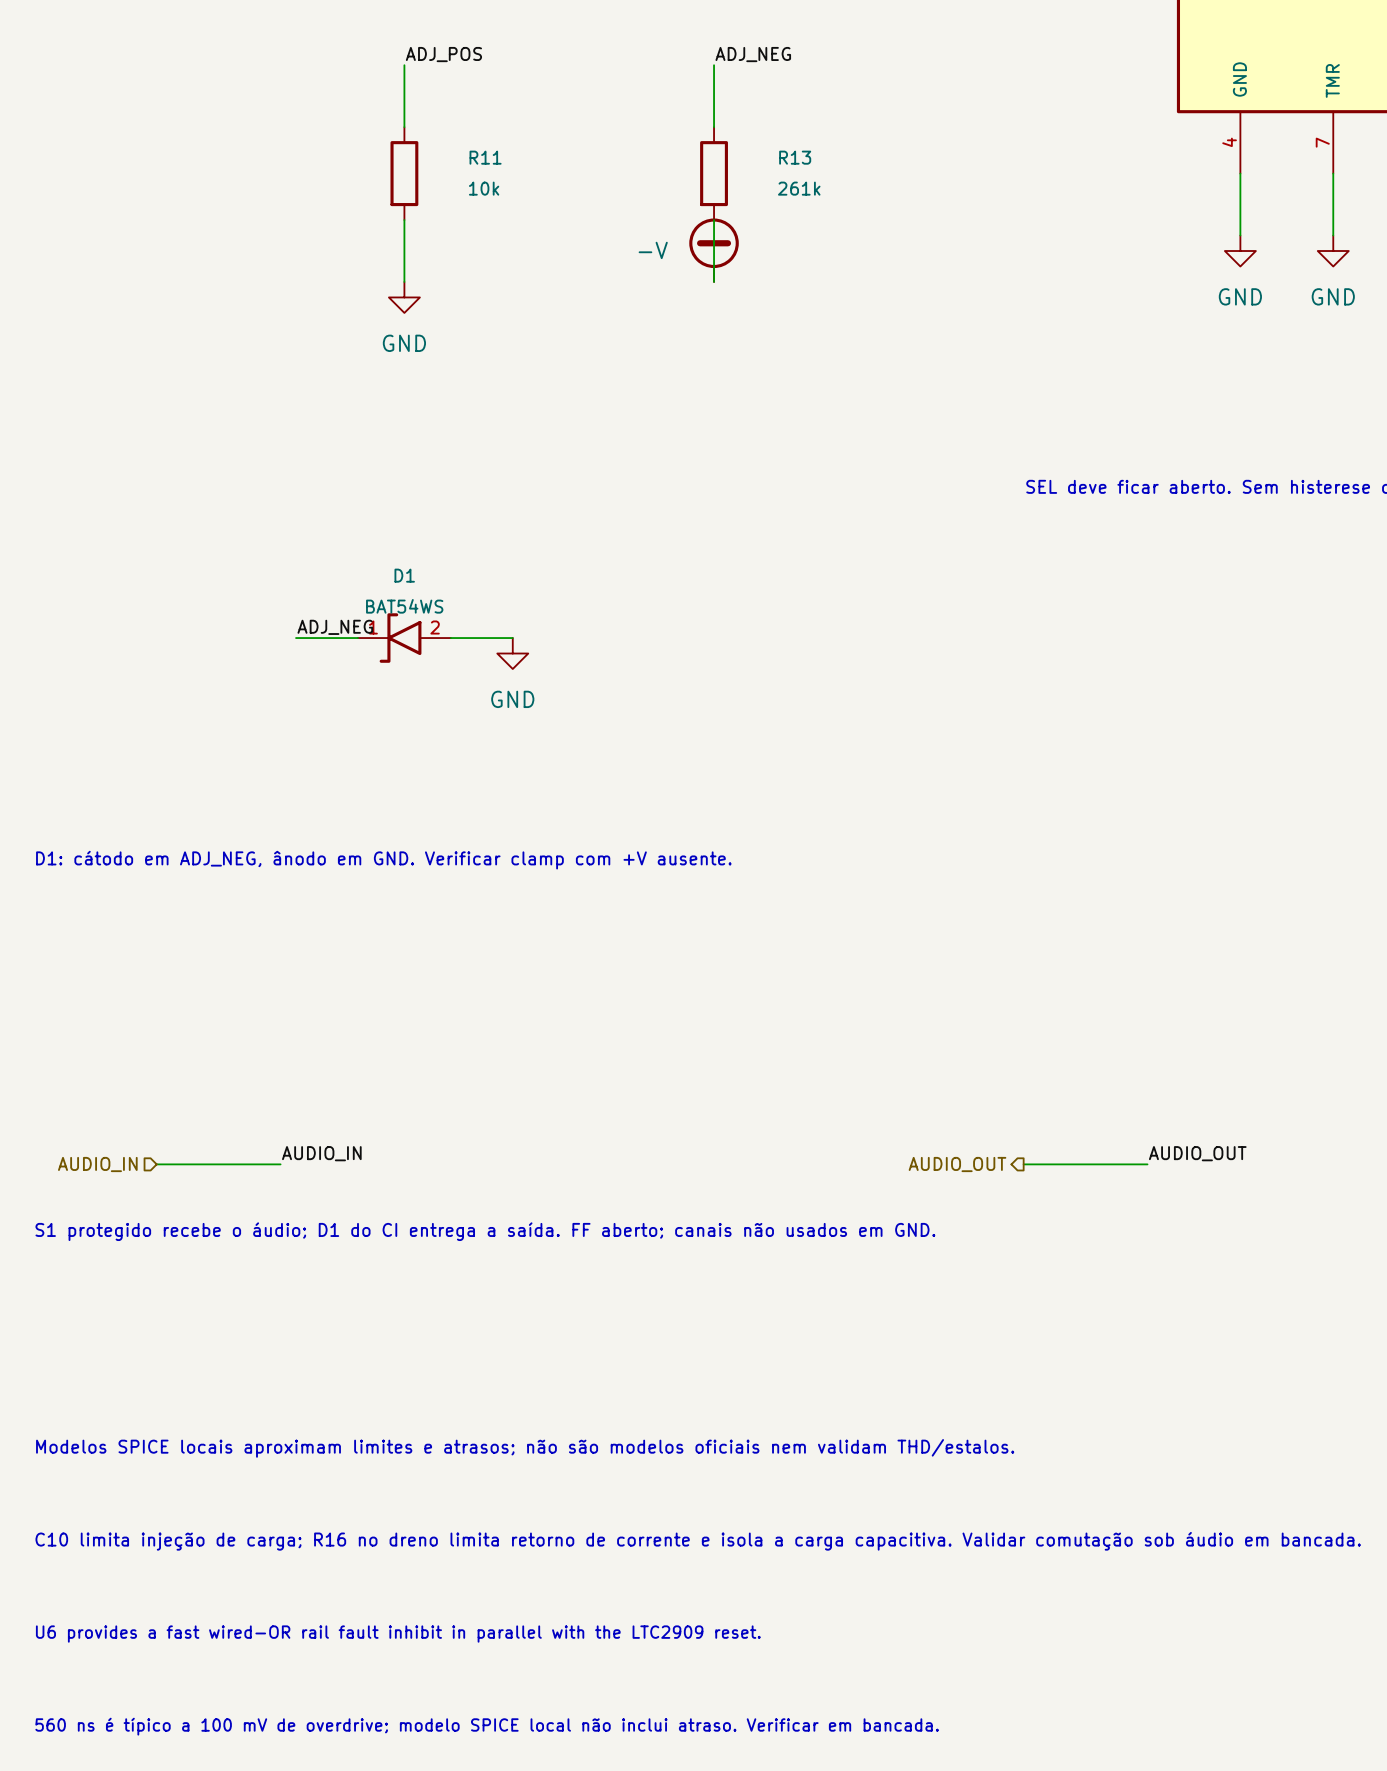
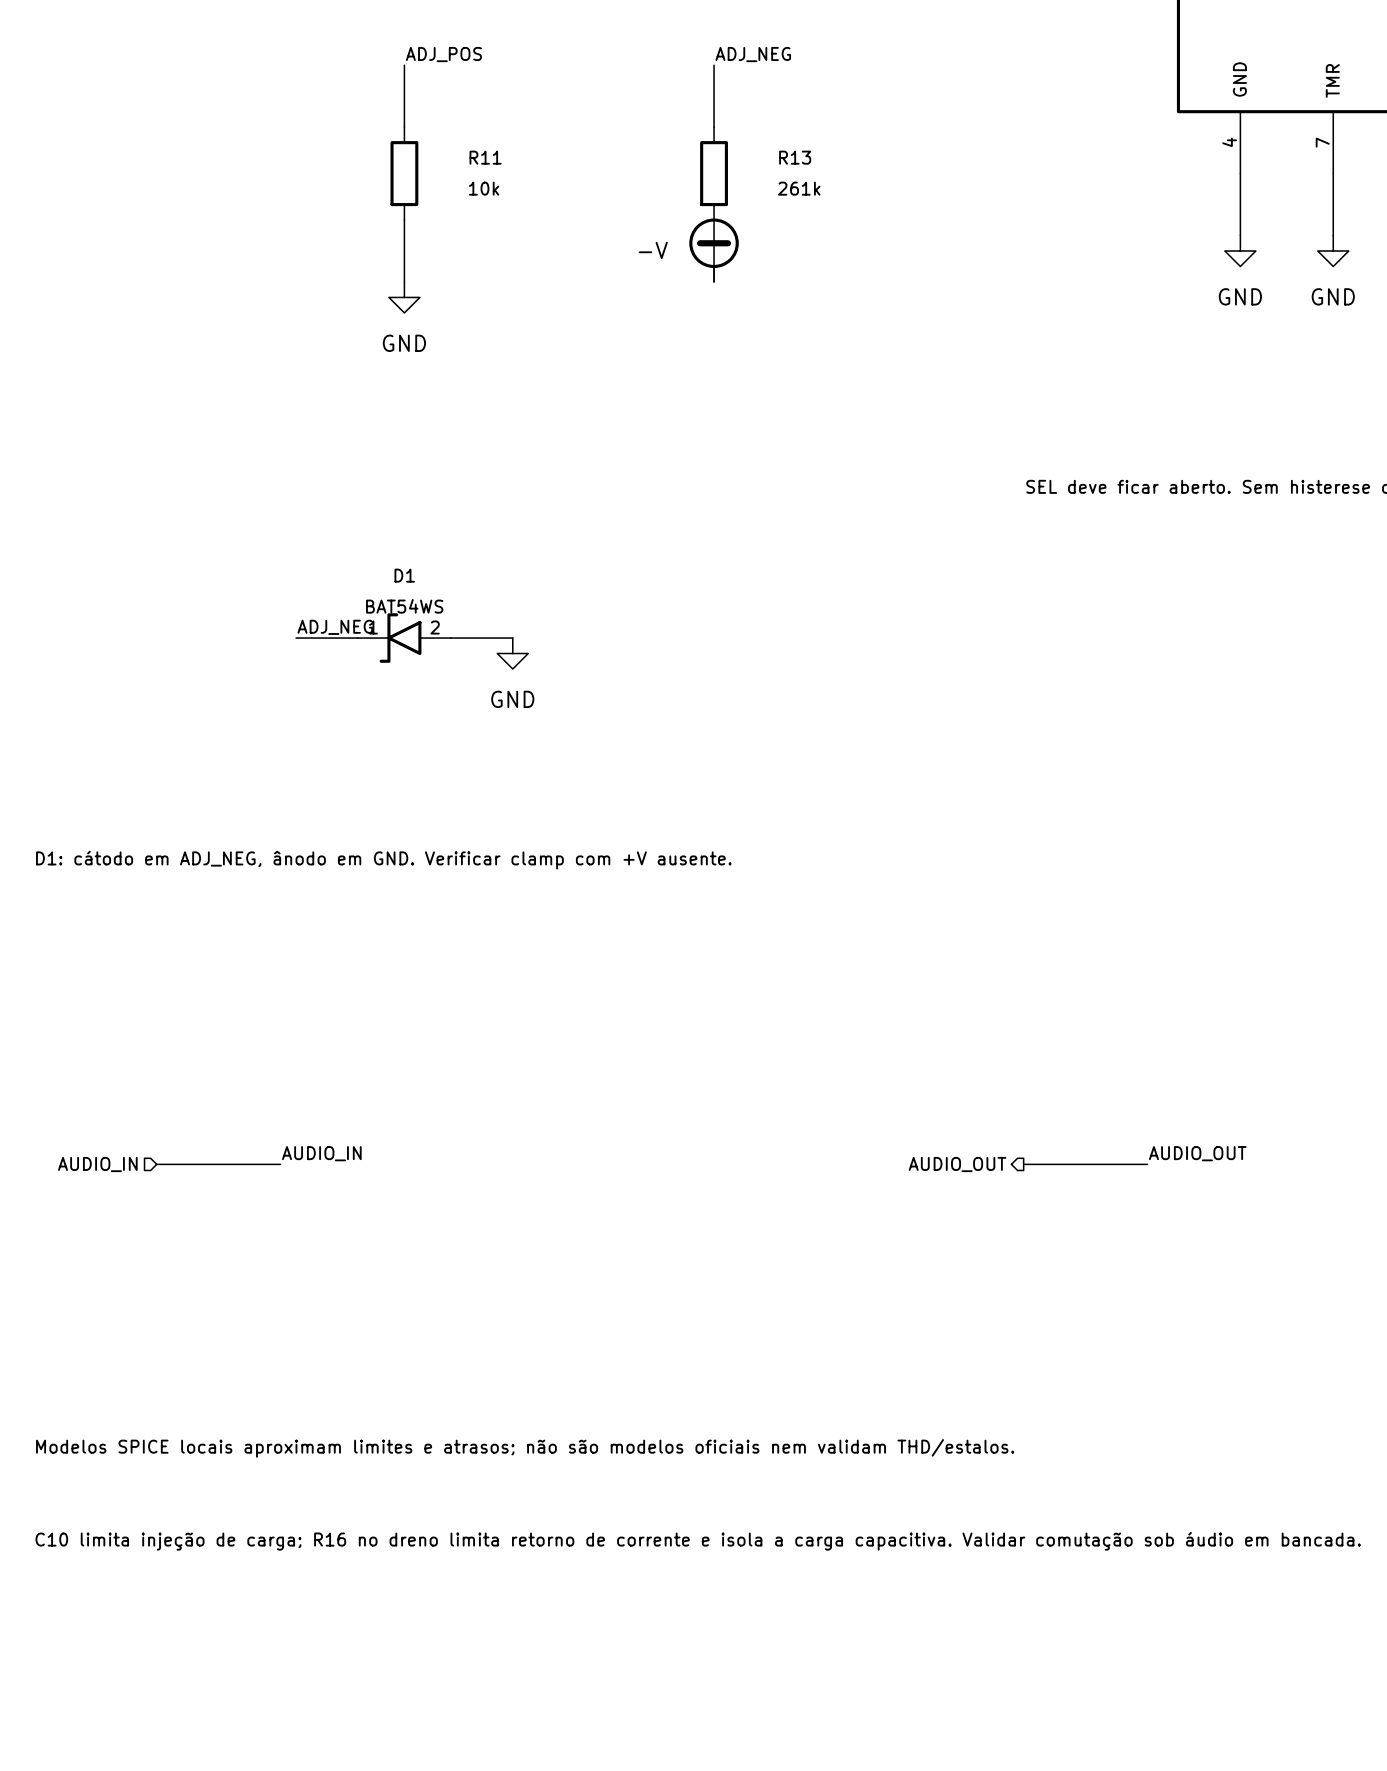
text: S1 protegido recebe o áudio; D1 do CI entrega a saída. FF aberto; canais não usados em GND. (485, 1231) -> none
text: U6 provides a fast wired-OR rail fault inhibit in parallel with the LTC2909 reset. (398, 1634) -> none
text: 560 ns é típico a 100 mV de overdrive; modelo SPICE local não inclui atraso. Verificar em bancada. (487, 1726) -> none

